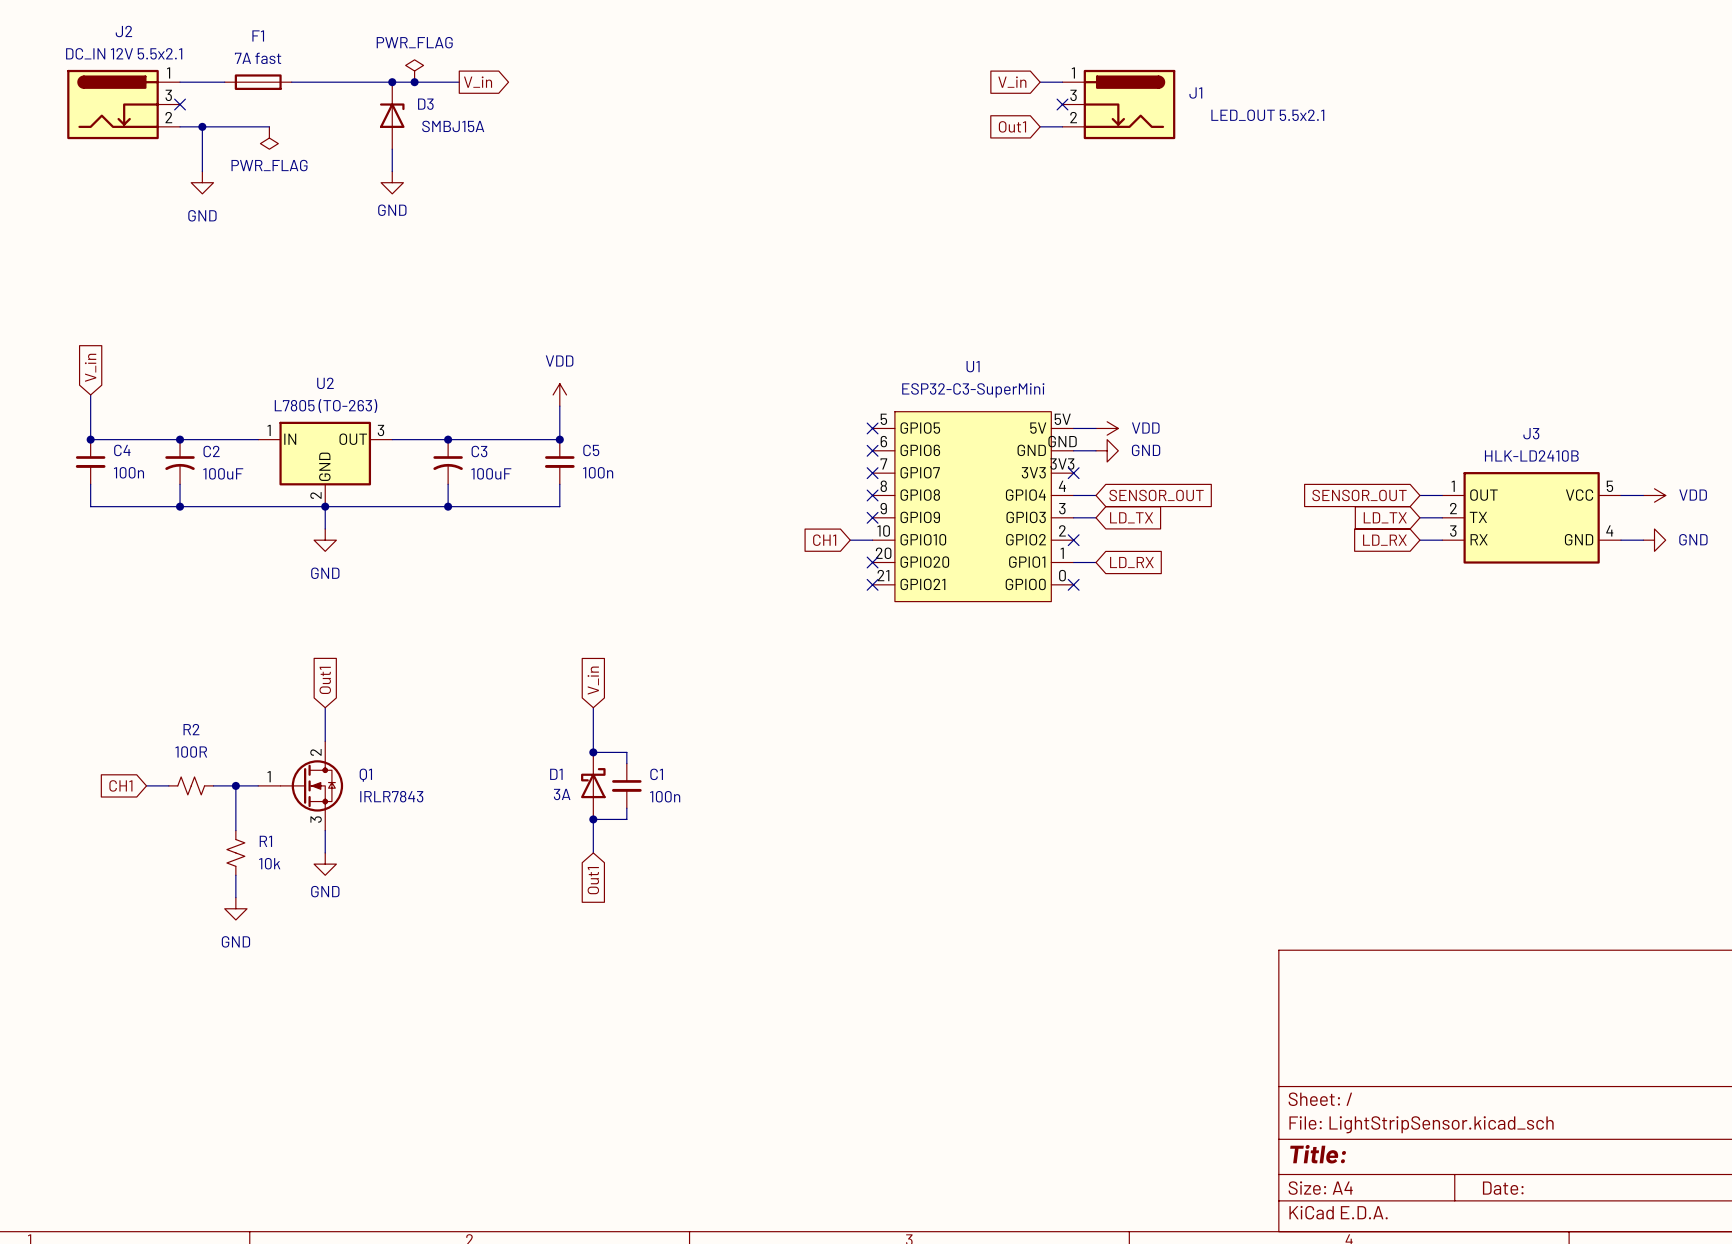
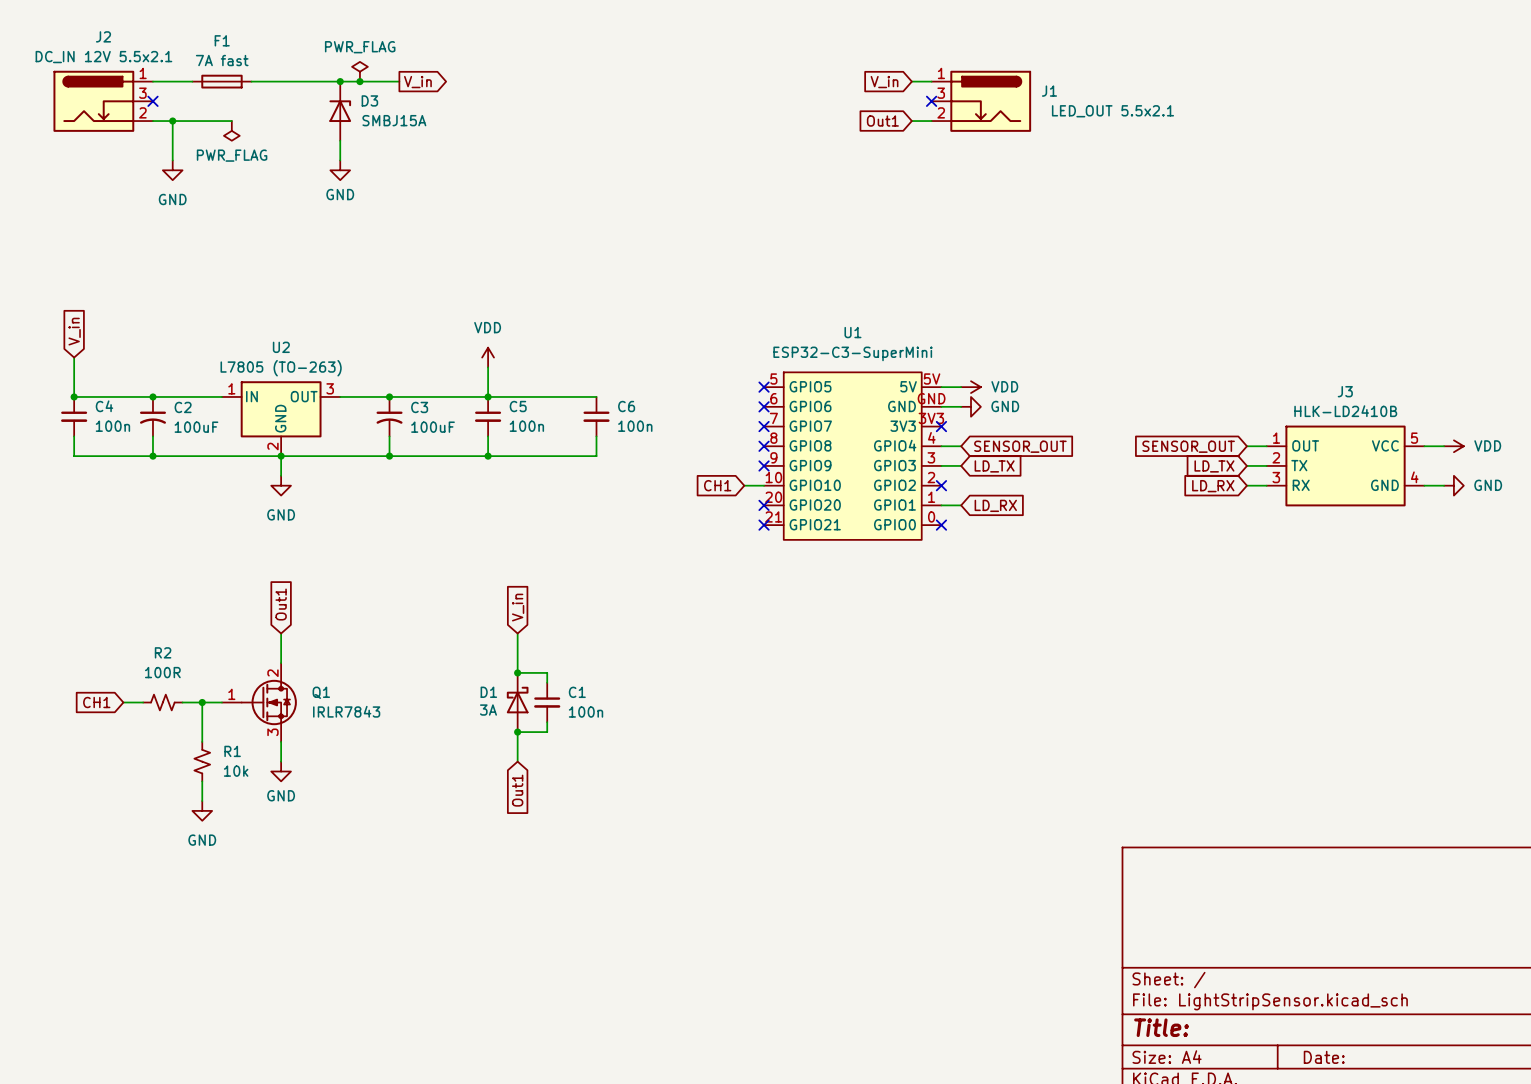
wire: none -> (488, 396) (596, 396)
C6: none -> 100n (596, 416)
wire: none -> (596, 436) (596, 456) (488, 456)
junction: none -> (488, 456)

